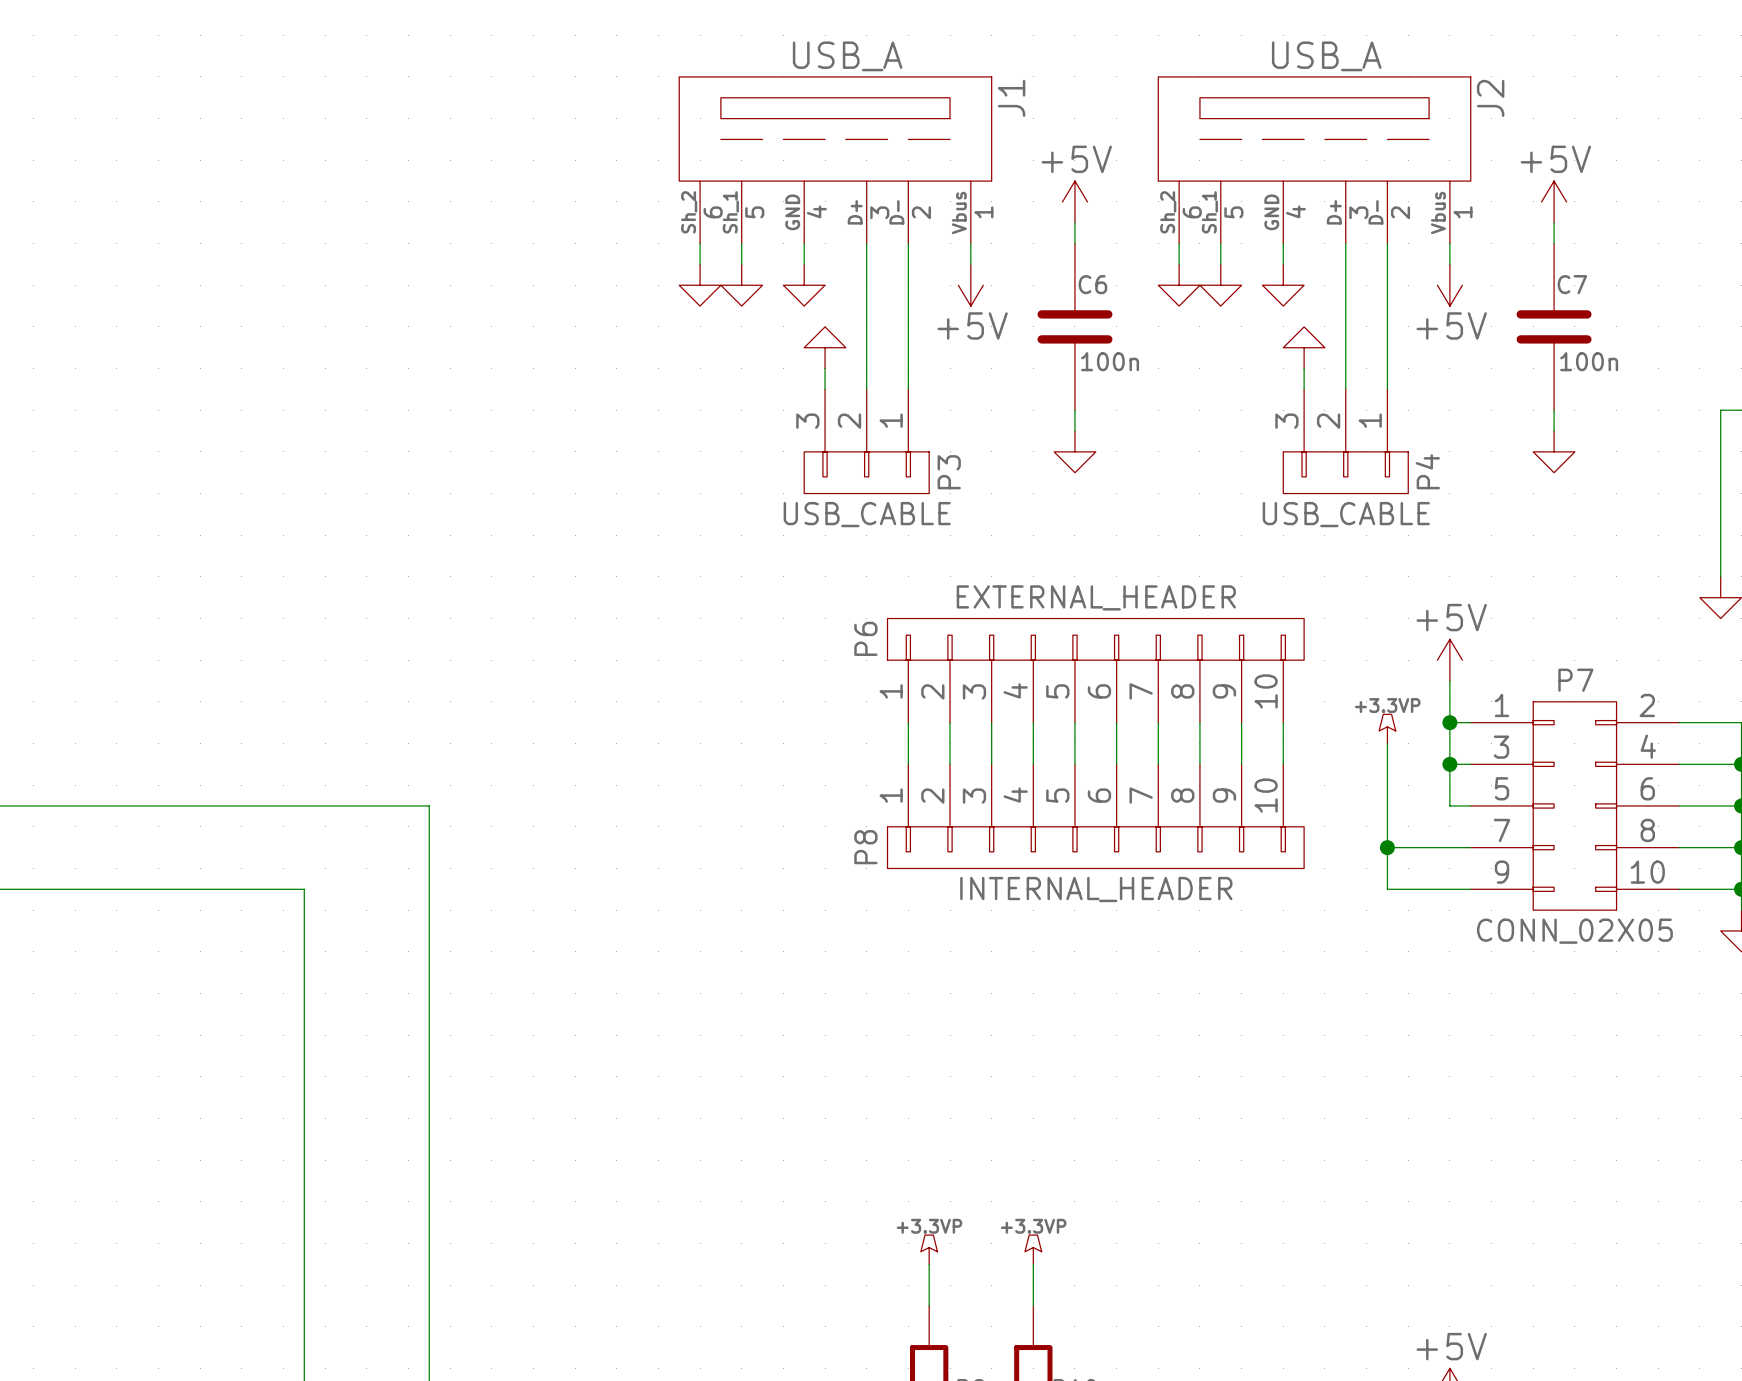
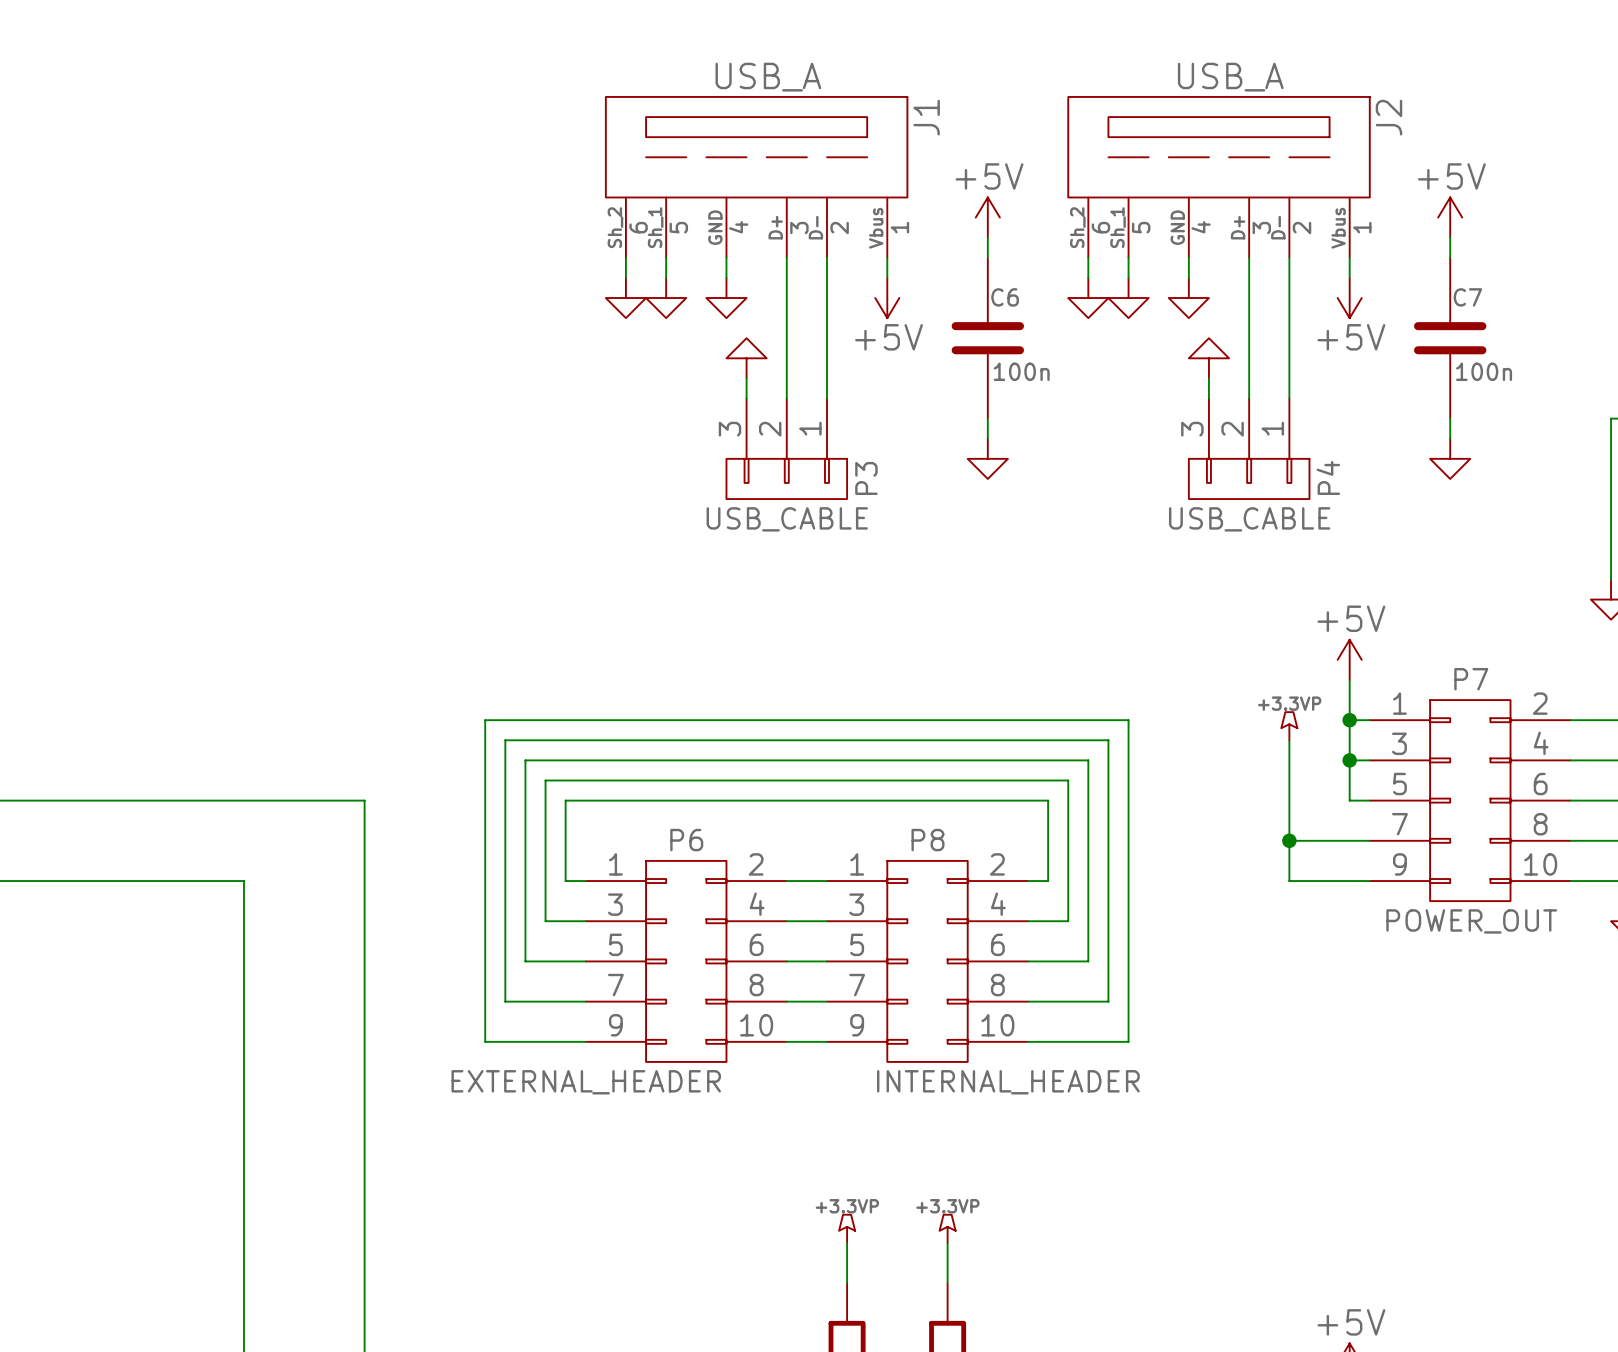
P6 value position: EXTERNAL_HEADER (1096, 597) -> EXTERNAL_HEADER (586, 1082)
P6 symbol: [887, 618, 1305, 723] -> [585, 860, 787, 1062]
P6 name position: P6 (865, 638) -> P6 (686, 840)
wire: (908, 722) (908, 764) -> none
wire: (950, 722) (950, 764) -> none
wire: (991, 722) (991, 764) -> none
wire: (1033, 722) (1033, 764) -> none
wire: (1074, 722) (1074, 764) -> none
wire: (1116, 722) (1116, 764) -> none
wire: (1158, 722) (1158, 764) -> none
wire: (1199, 722) (1199, 743) -> (585, 1001) (505, 1001) (505, 740) (1108, 740)
wire: (1241, 722) (1241, 764) -> none
wire: (1283, 722) (1283, 764) -> none
P8 symbol: [887, 764, 1305, 869] -> [826, 860, 1029, 1062]
wire: none -> (1108, 760) (1108, 1001) (1028, 1001)
P8 name position: P8 (865, 847) -> P8 (927, 840)
wire: none -> (585, 881) (565, 881) (565, 800) (1048, 800) (1048, 881) (1028, 881)
wire: none -> (786, 881) (826, 881)
P8 value position: INTERNAL_HEADER (1096, 889) -> INTERNAL_HEADER (1008, 1082)
wire: none -> (585, 921) (545, 921) (545, 780) (1068, 780) (1068, 921) (1028, 921)
wire: none -> (786, 921) (826, 921)
P7 value: CONN_02X05 (1574, 931) -> POWER_OUT (1471, 921)
wire: none -> (585, 961) (525, 961) (525, 760) (1088, 760) (1088, 961) (1028, 961)
wire: none -> (786, 961) (826, 961)
wire: none -> (786, 1001) (826, 1001)
wire: none -> (585, 1041) (485, 1041) (485, 720) (1128, 720) (1128, 1041) (1028, 1041)
wire: none -> (786, 1041) (826, 1041)

